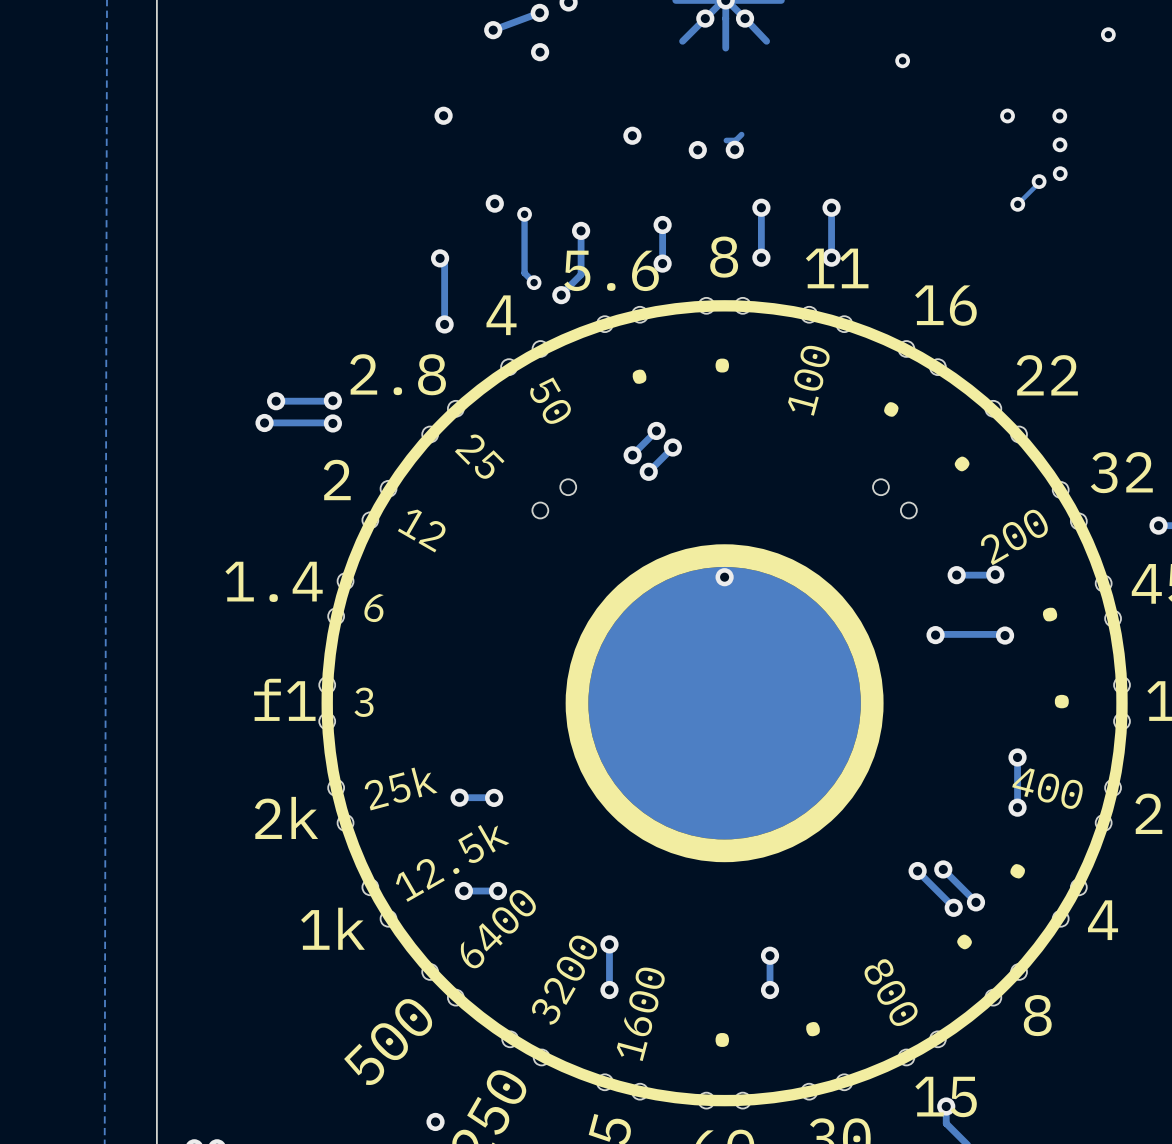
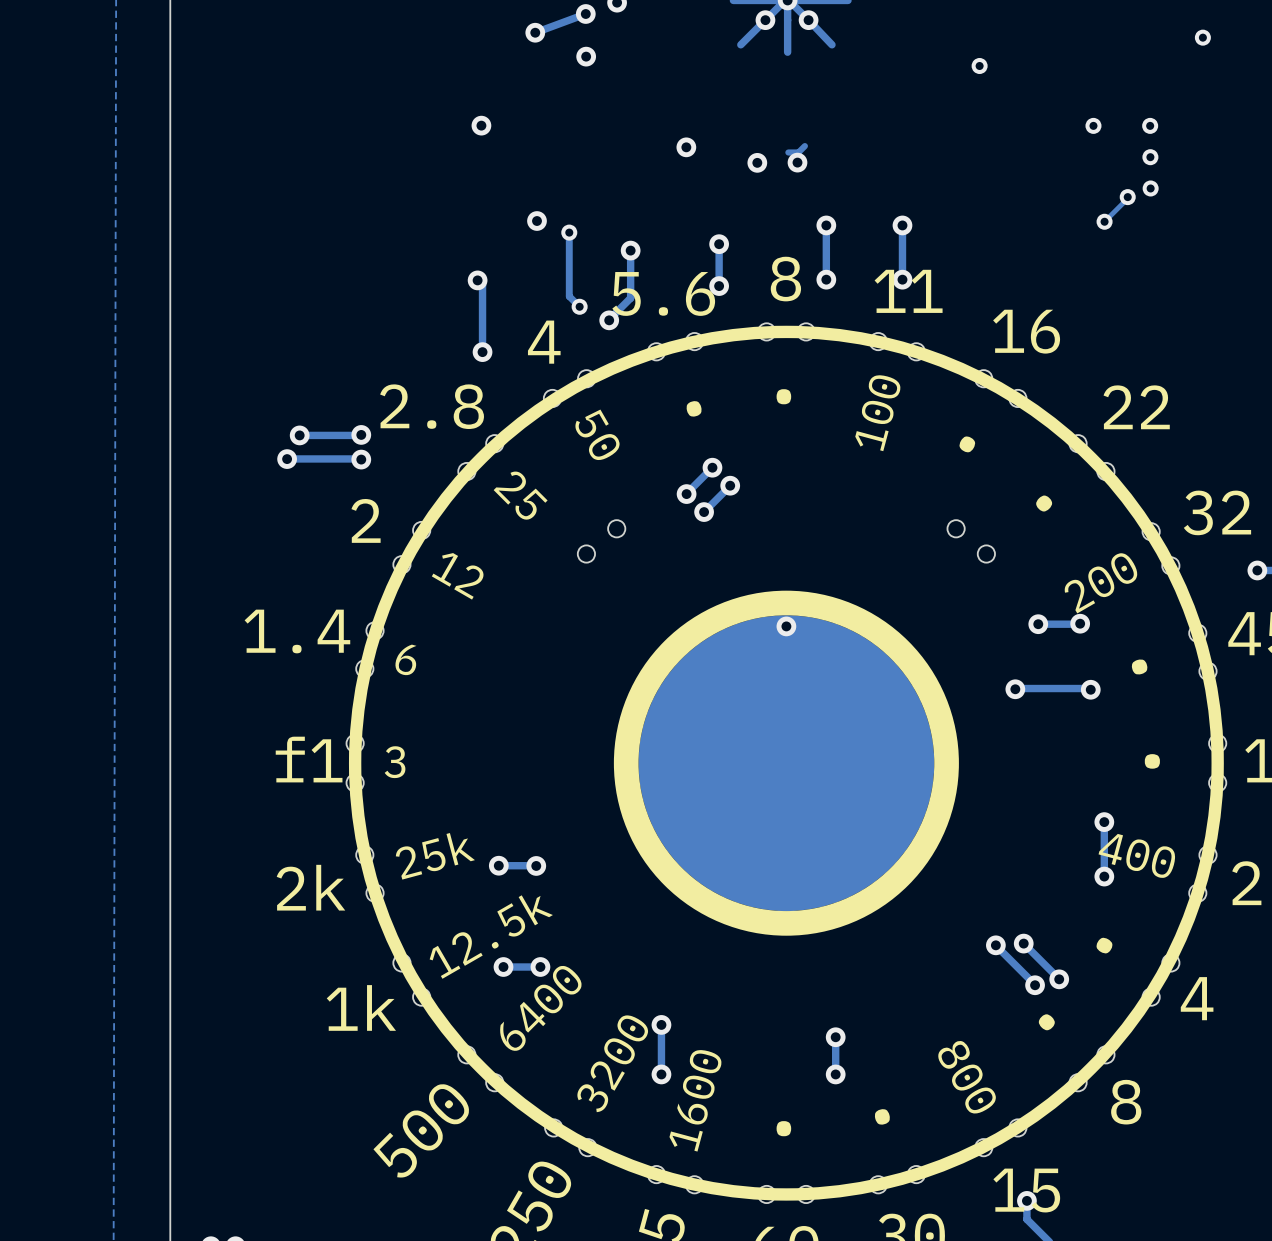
via: (435, 1121) -> none

